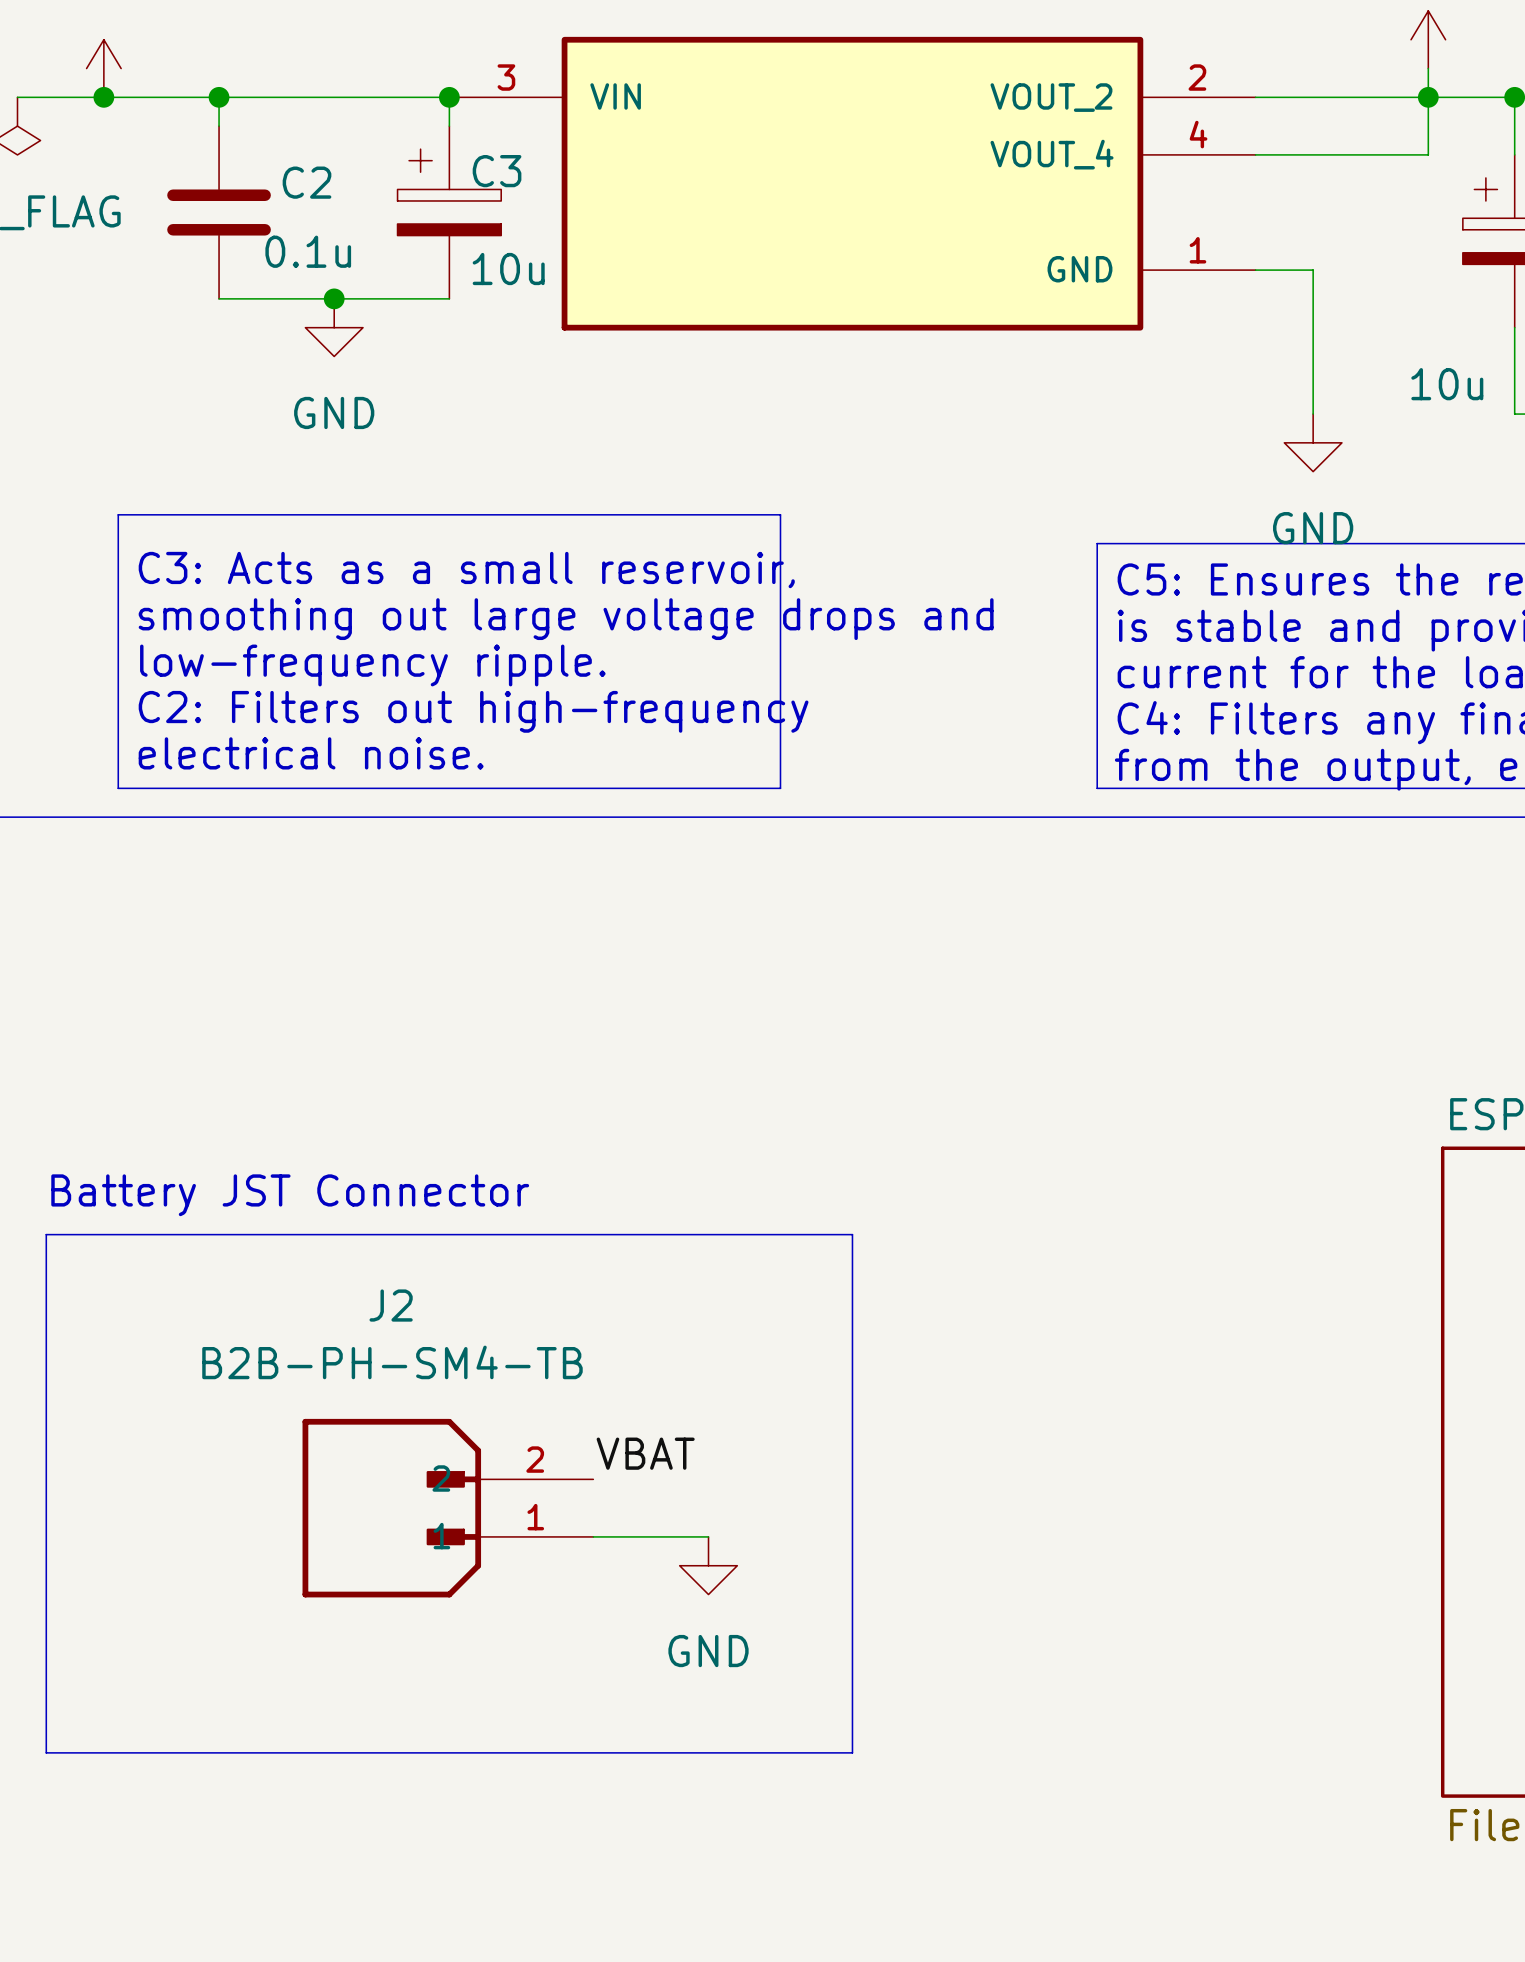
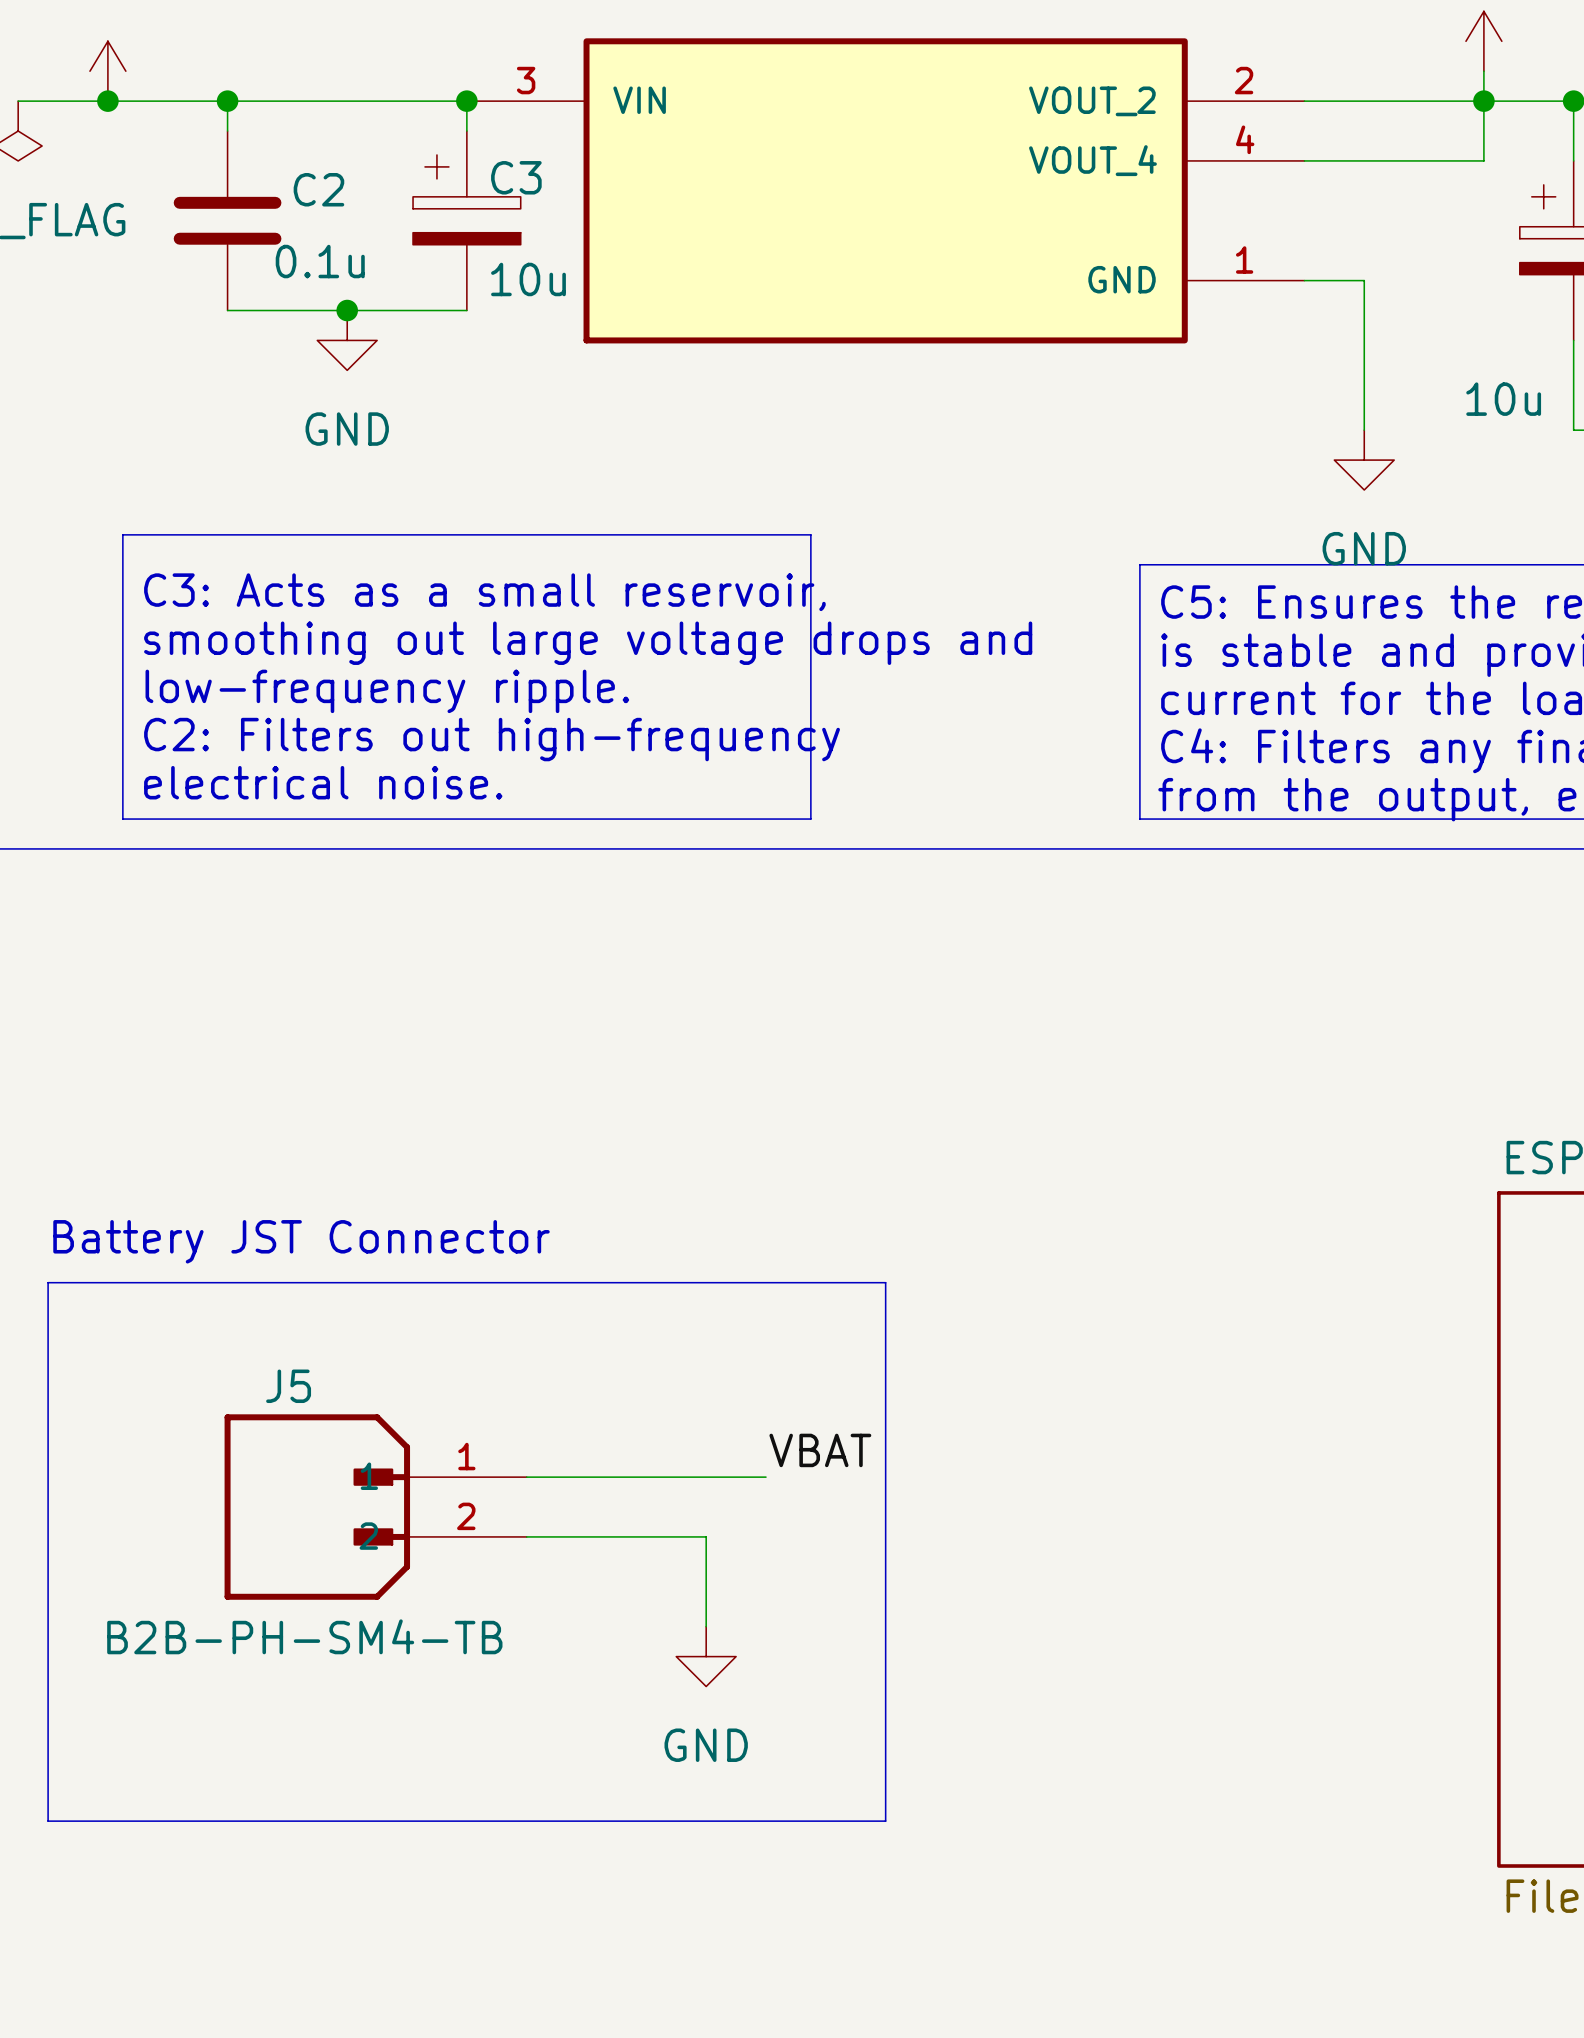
wire: none -> (526, 1477) (766, 1477)
J5: none -> B2B-PH-SM4-TB (375, 1507)
label position: VBAT (645, 1453) -> VBAT (820, 1450)
wire: none -> (526, 1536) (706, 1536) (706, 1626)
J2: B2B-PH-SM4-TB (447, 1508) -> none
wire: (593, 1536) (708, 1536) -> none
power symbol position: GND (708, 1565) -> GND (706, 1656)

